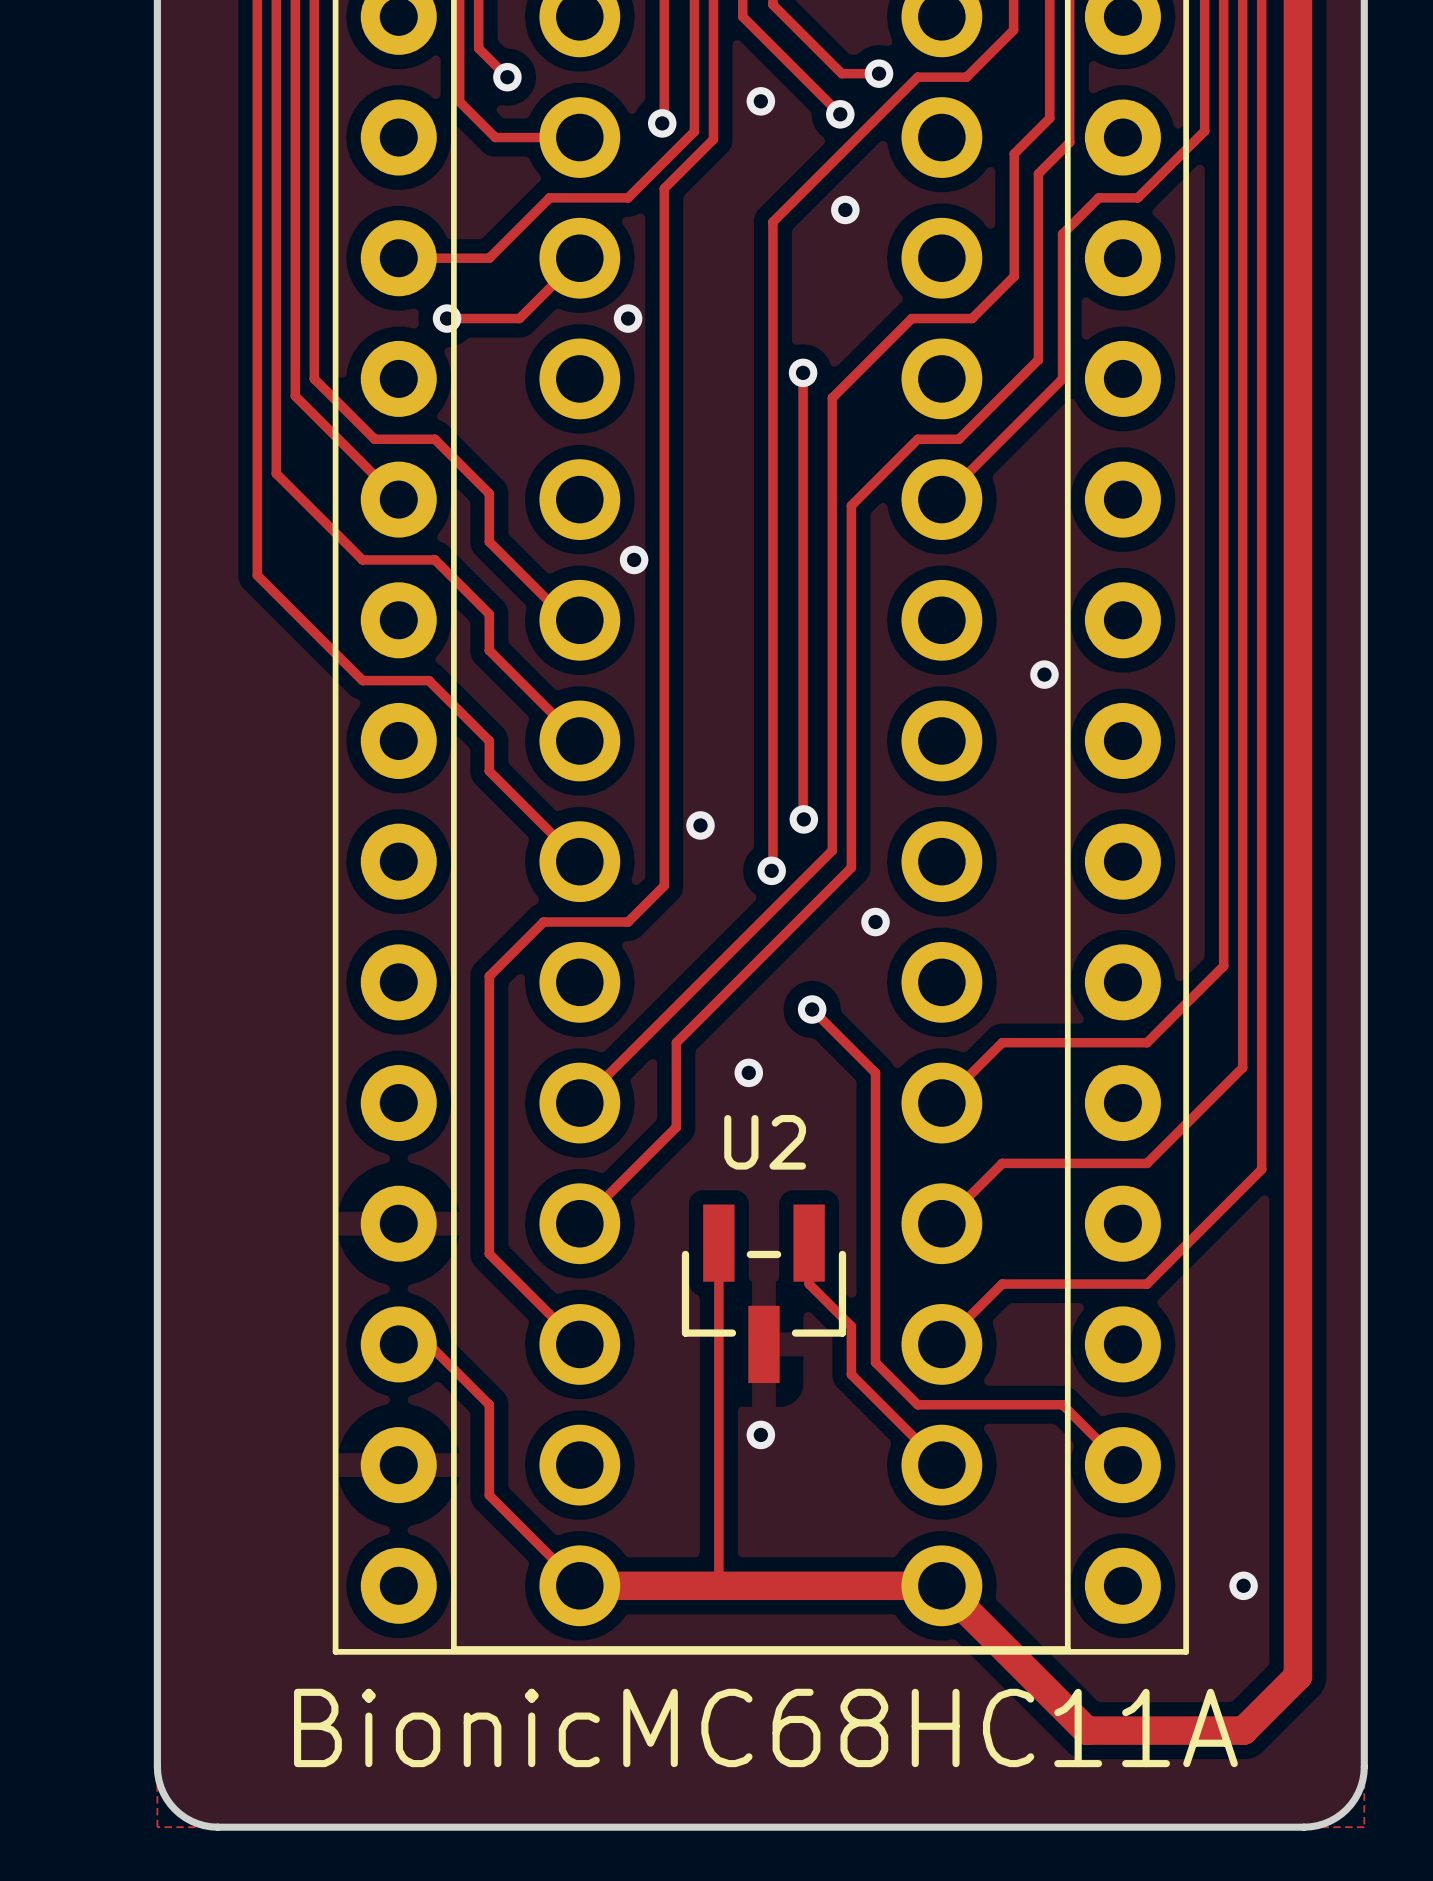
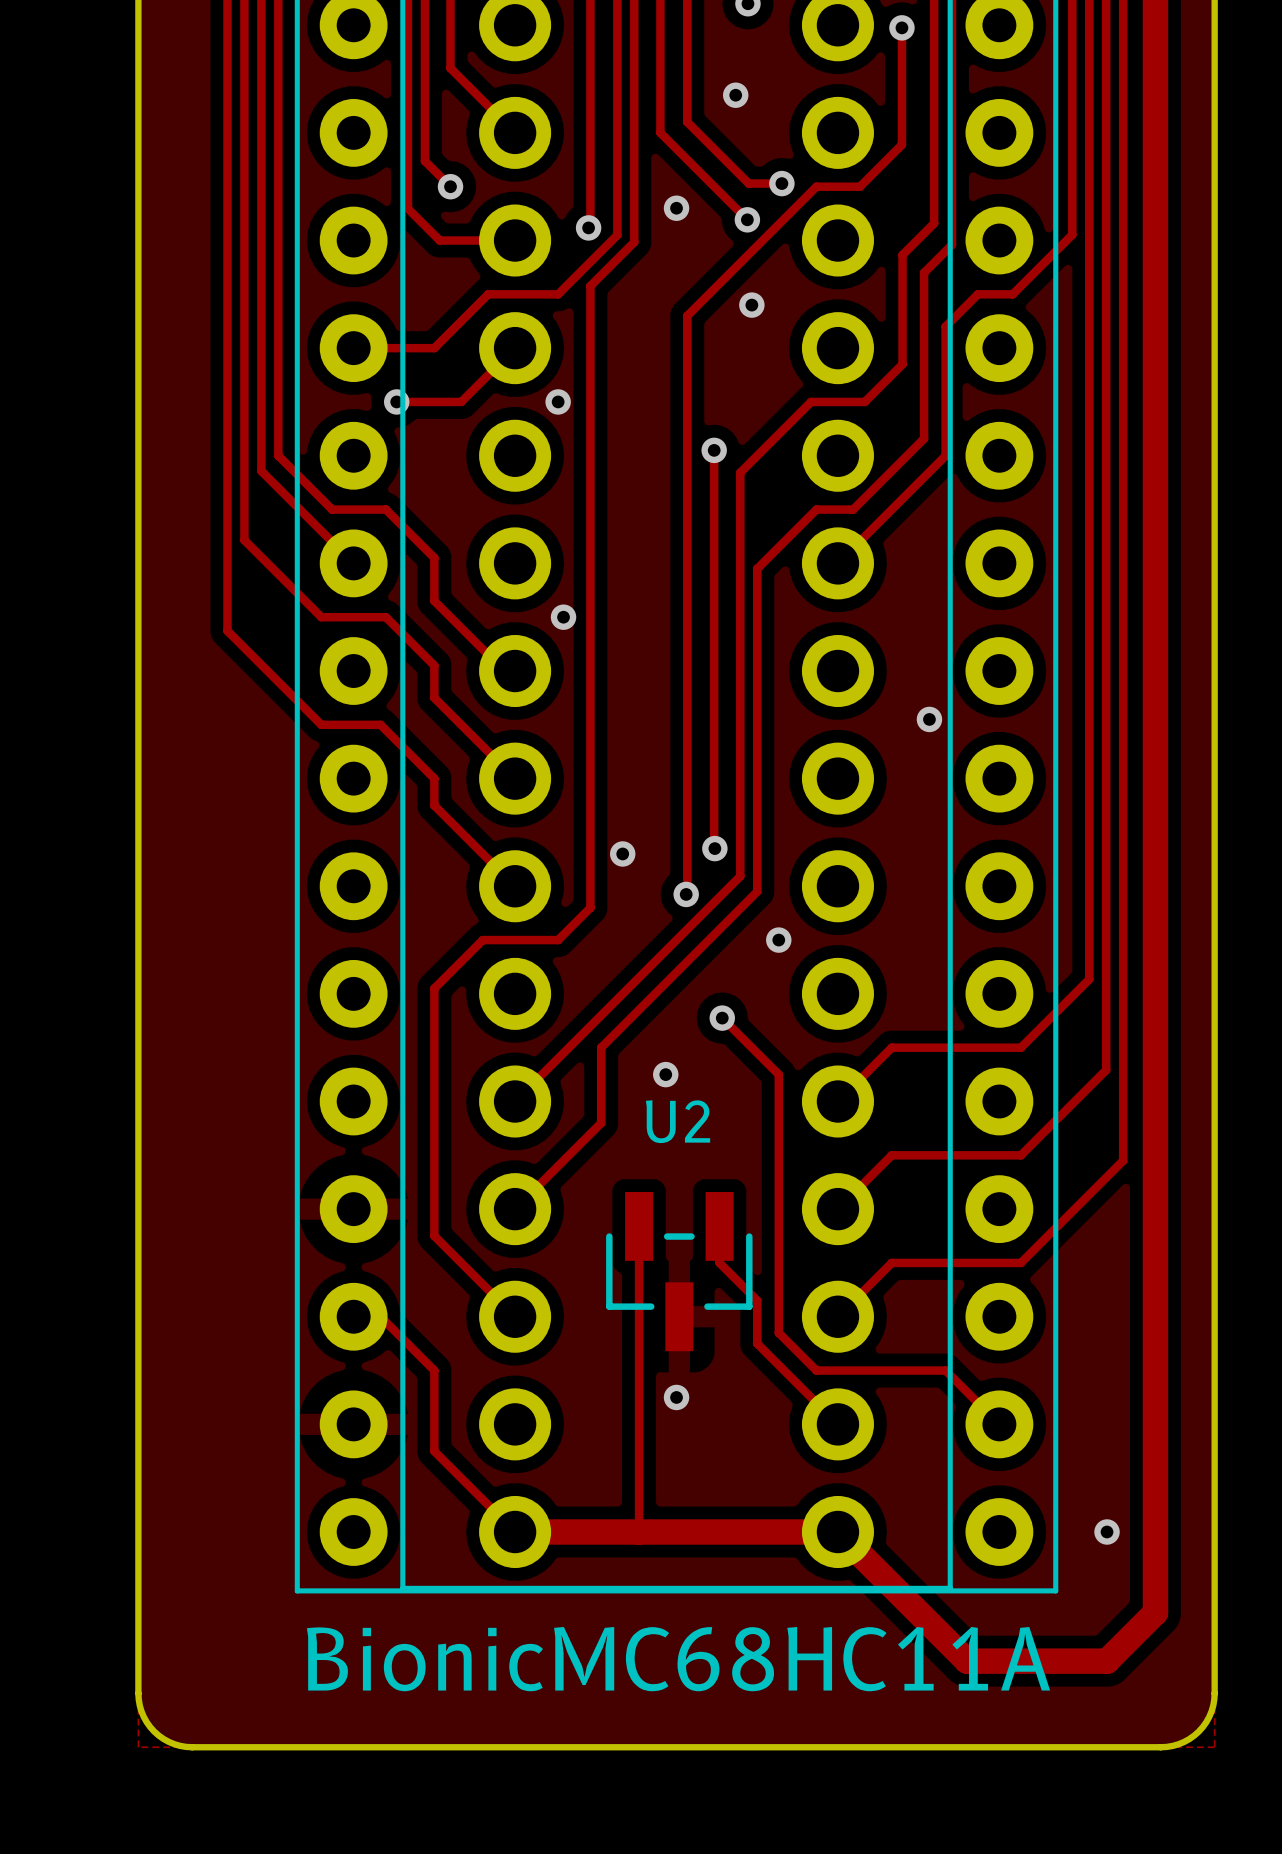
U2 name position: U2 (765, 1142) -> U2 (678, 1121)

